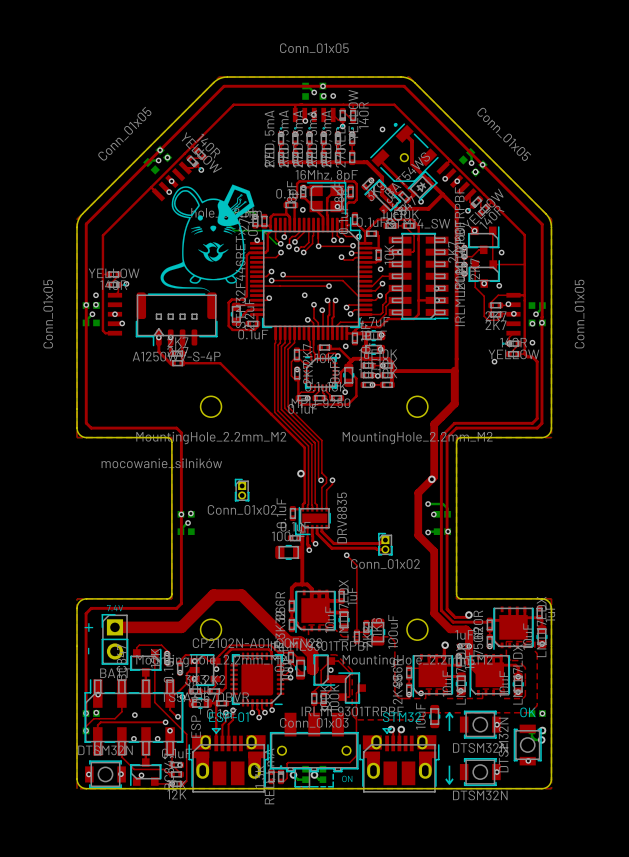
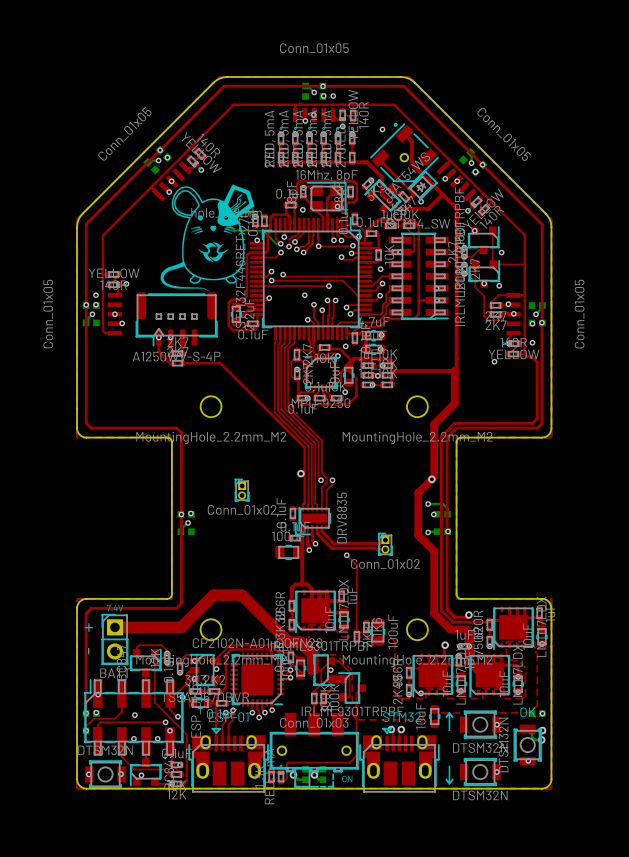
drawing: [101, 458, 223, 469] -> none

